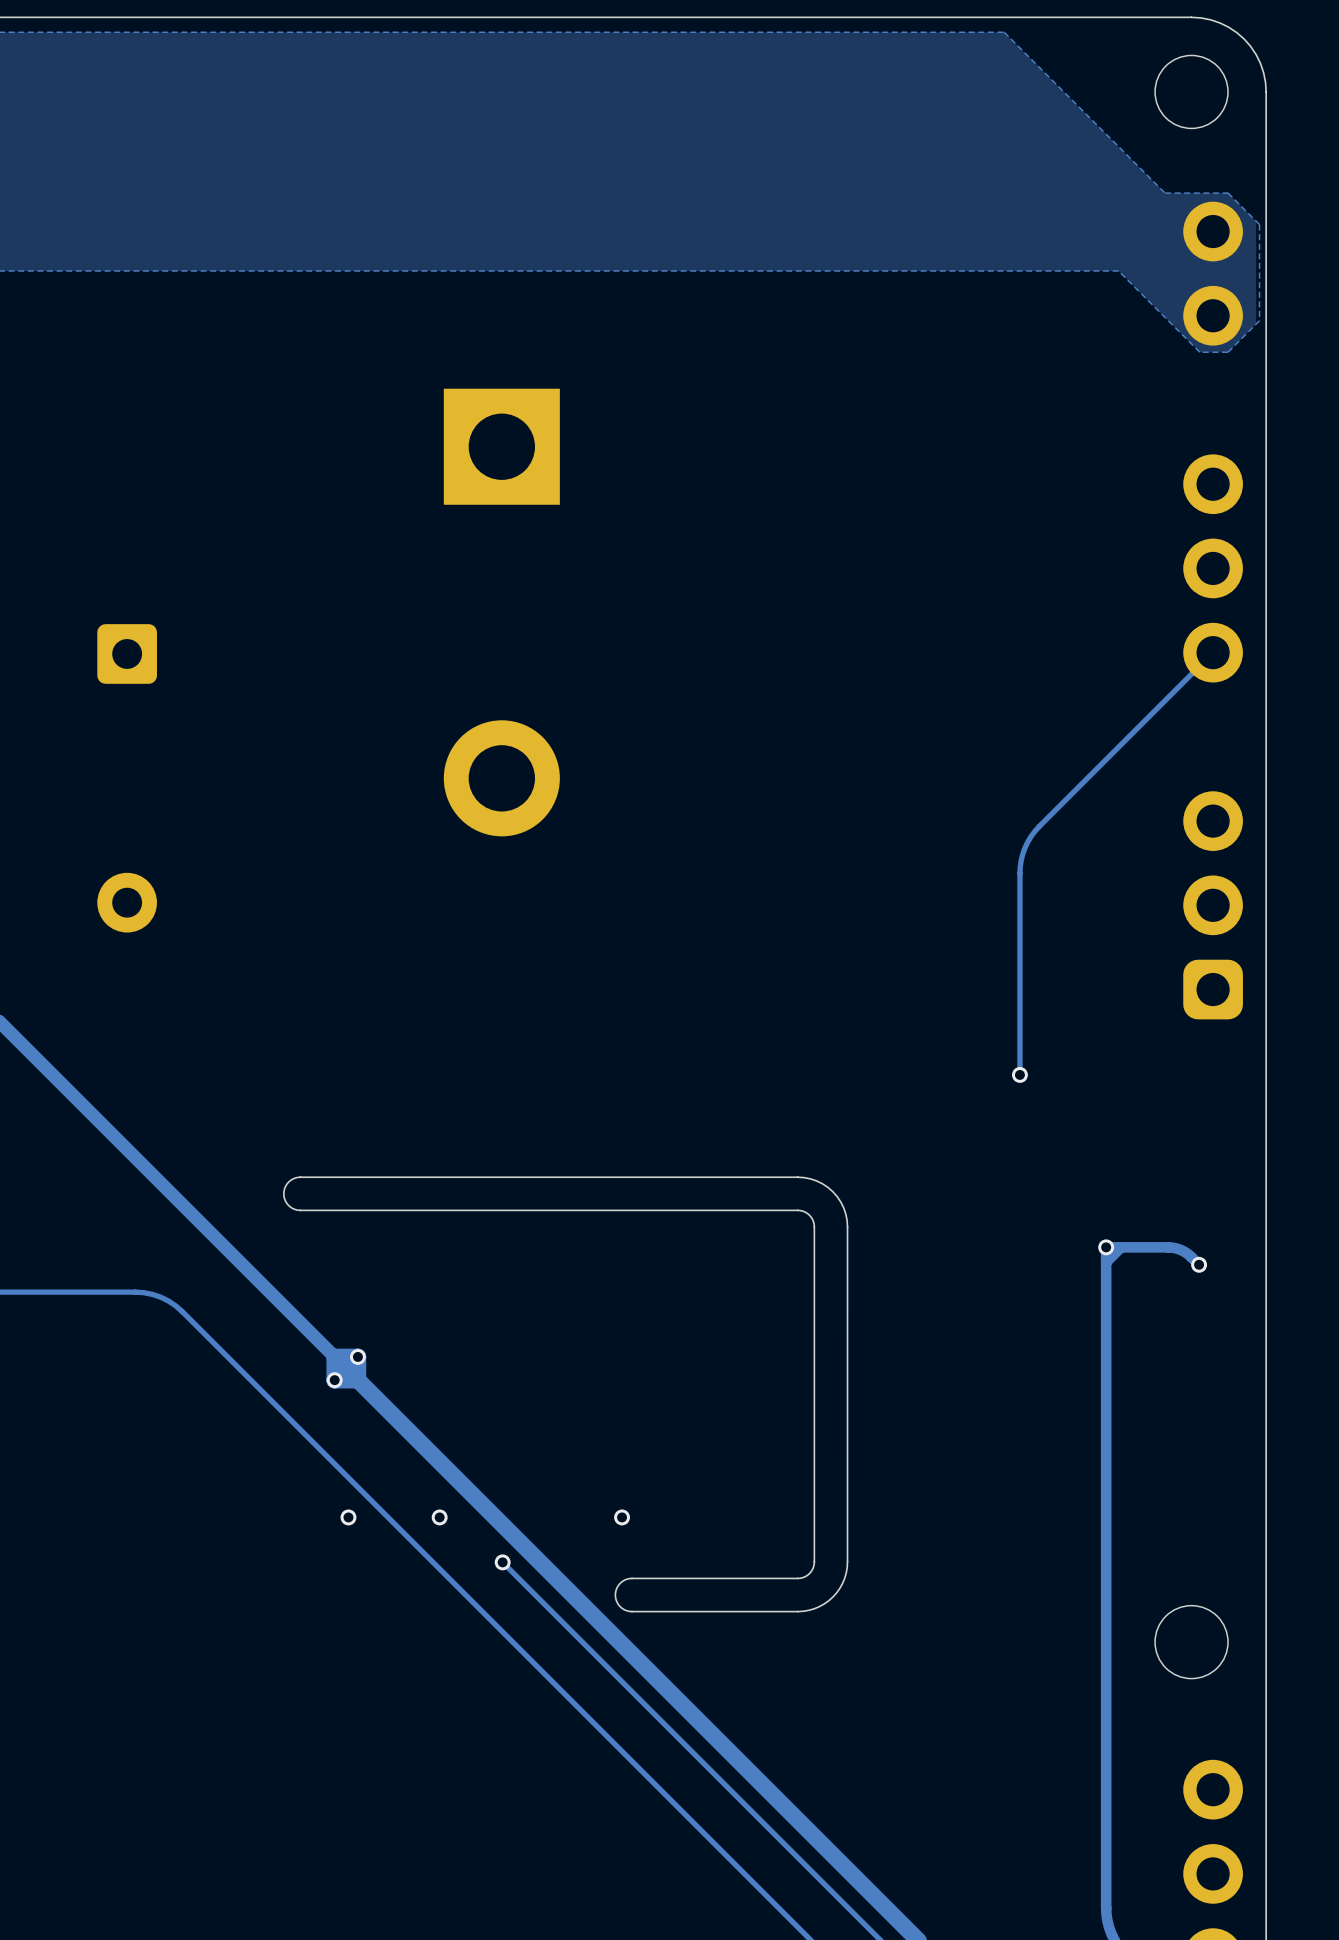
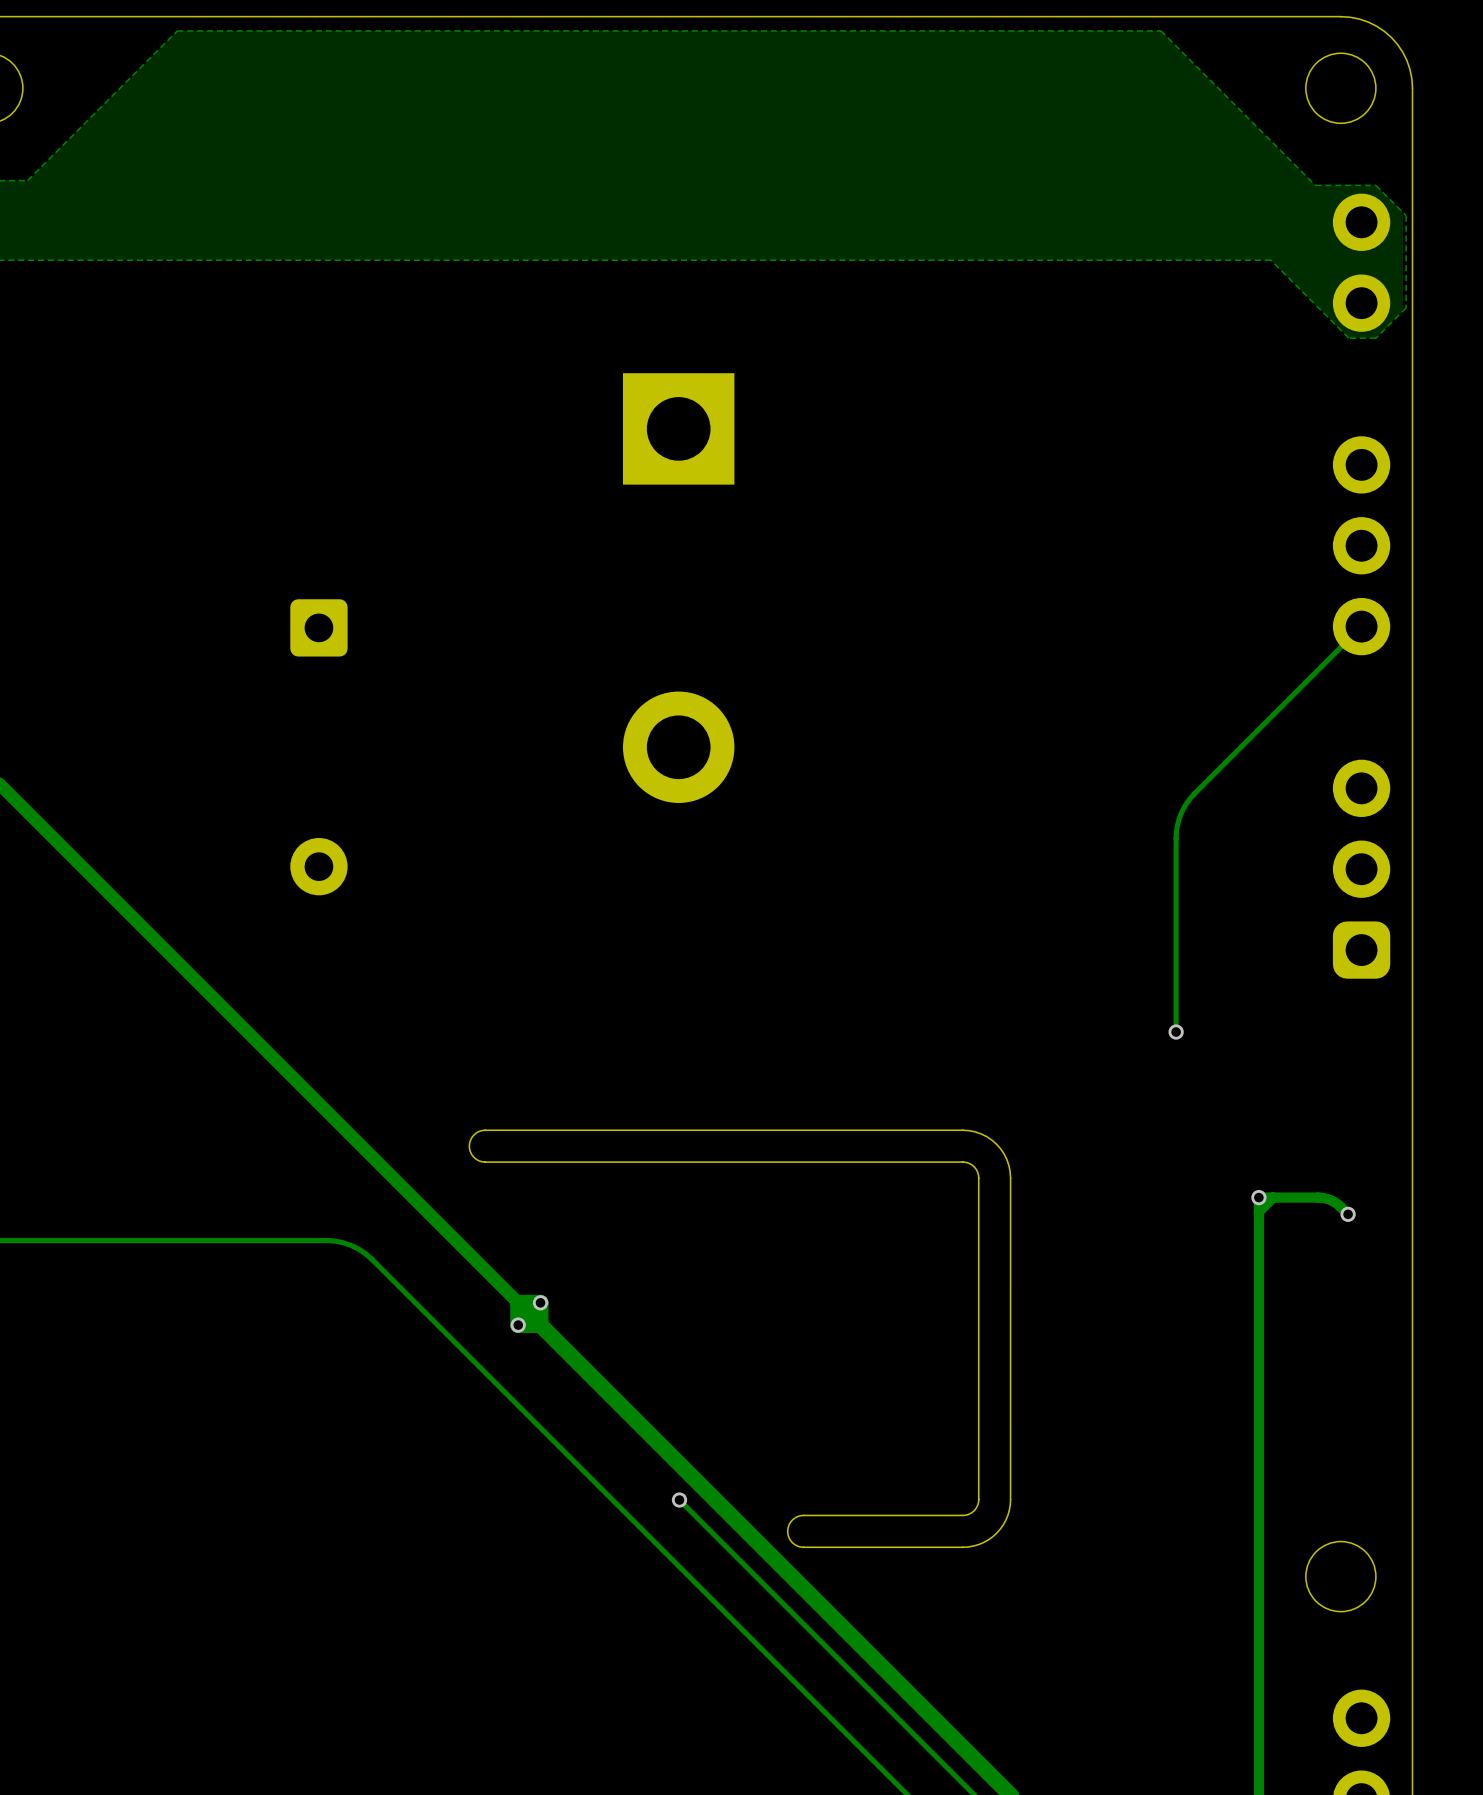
via: (348, 1517) -> none
via: (439, 1517) -> none
via: (622, 1517) -> none

